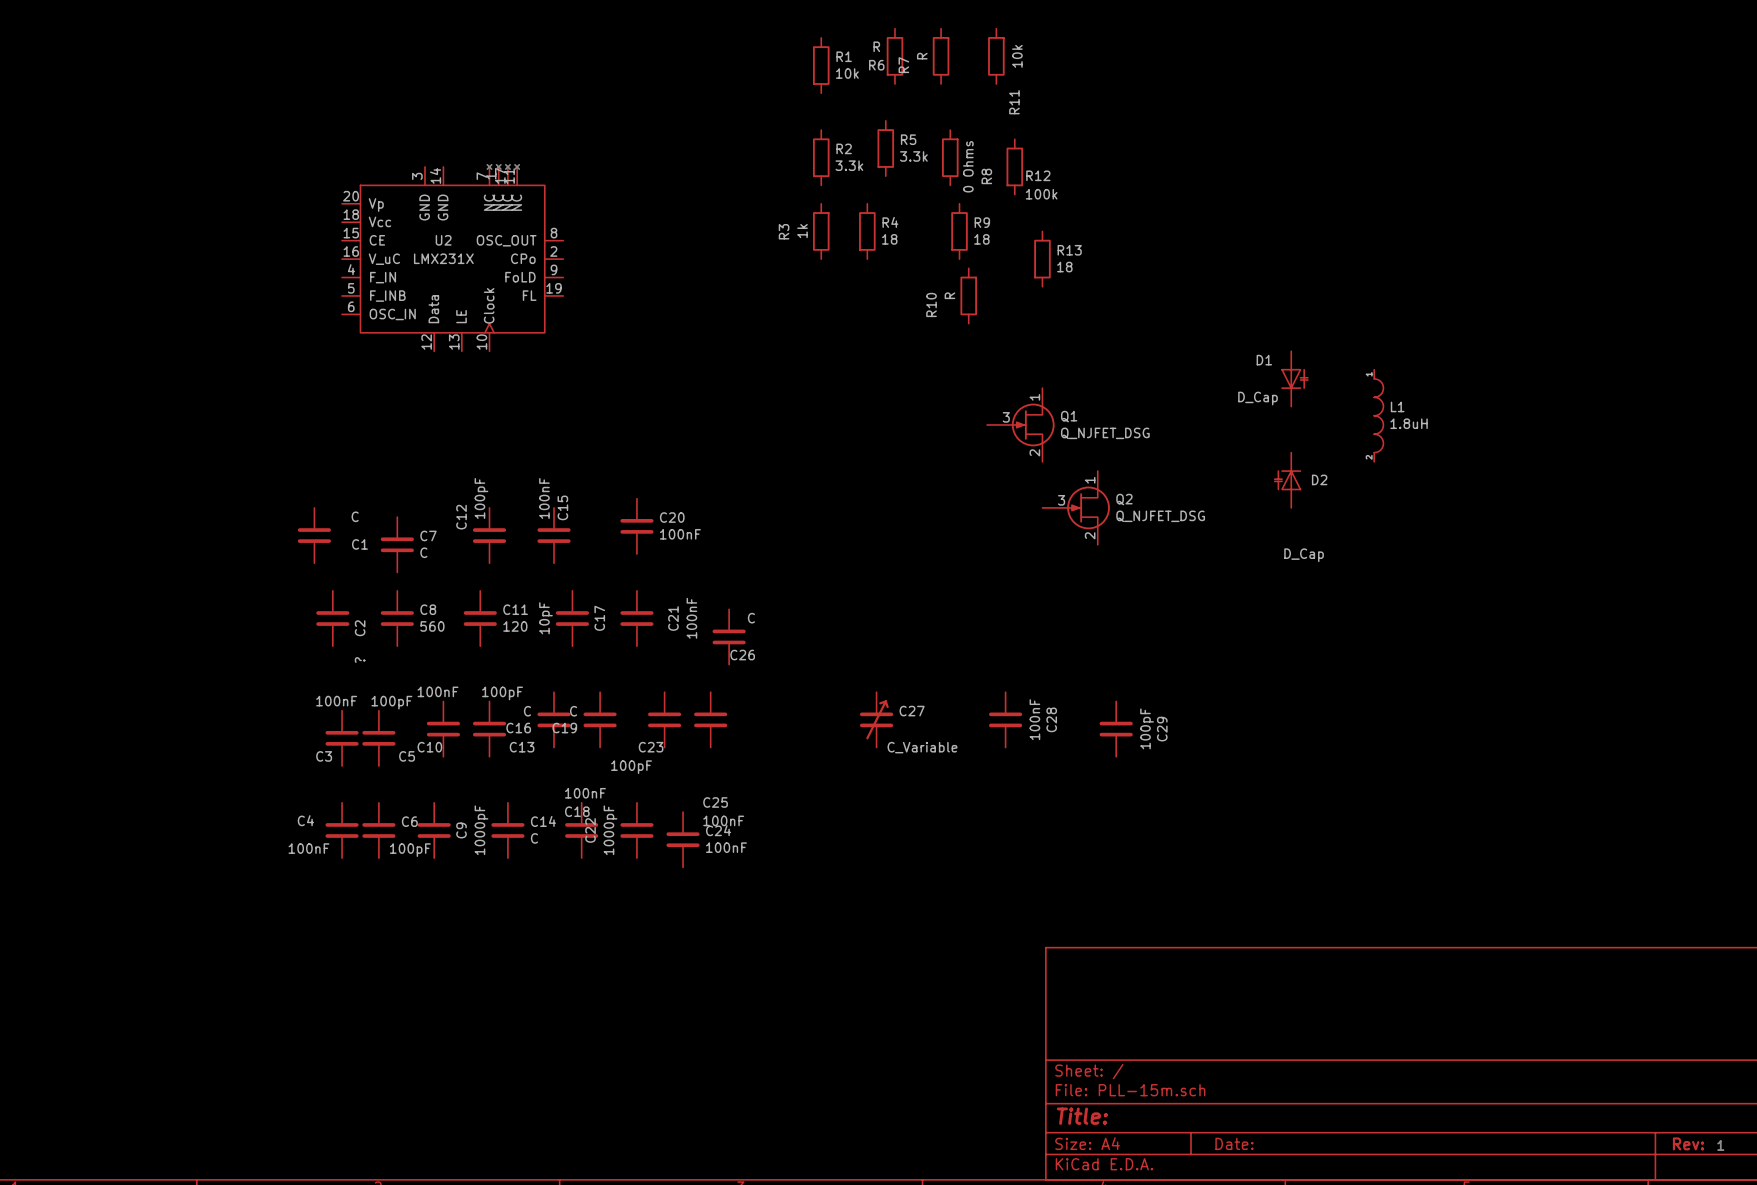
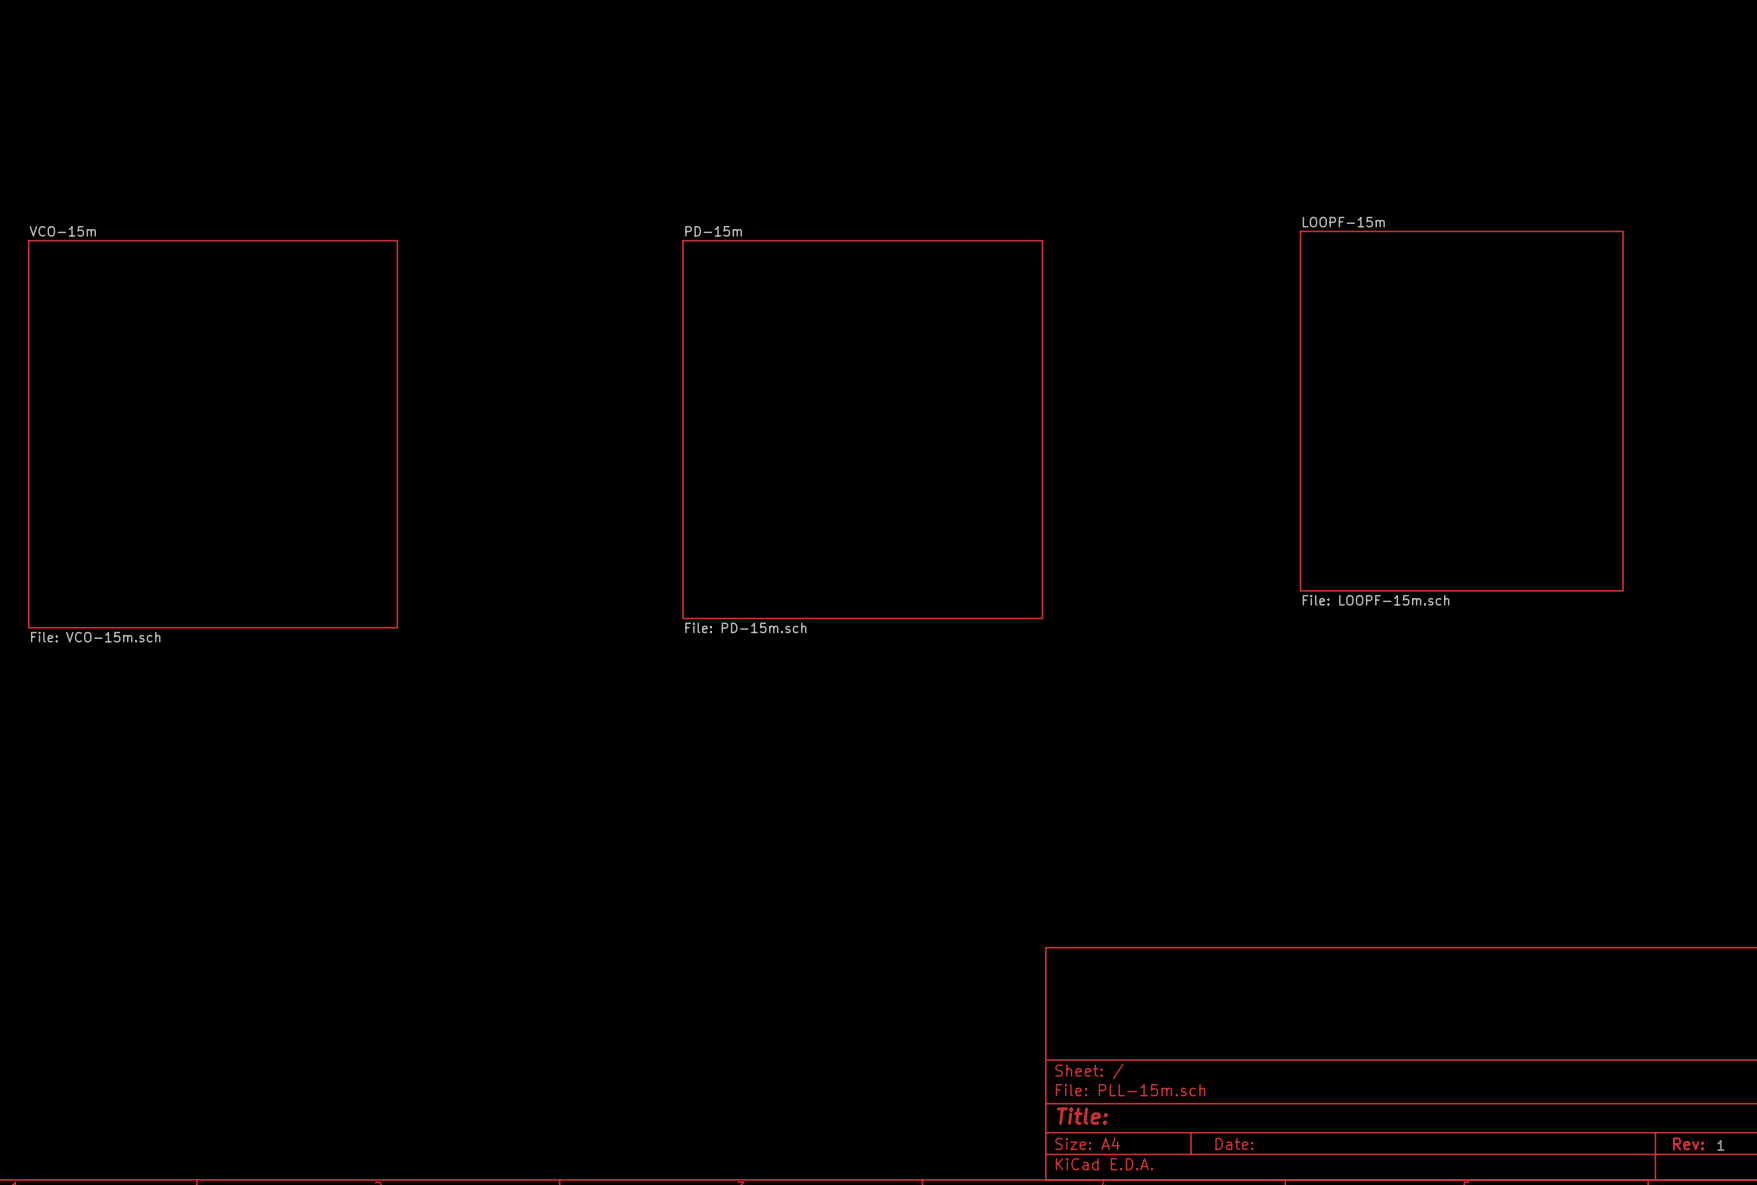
R6: R (894, 56) -> none
R7: R (941, 56) -> none
R11: 10k (996, 56) -> none
R1: 10k (821, 65) -> none
R5: 3.3k (885, 148) -> none
R2: 3.3k (821, 157) -> none
R8: 0 Ohms (950, 157) -> none
R12: 100k (1014, 166) -> none
R3: 1k (821, 231) -> none
R4: 18 (867, 231) -> none
R9: 18 (959, 231) -> none
U2: LMX231X (452, 258) -> none
R13: 18 (1042, 259) -> none
R10: R (968, 295) -> none
D1: D_Cap (1294, 378) -> none
sheet LOOPF-15m: none -> File: LOOPF-15m.sch (1461, 411)
L1: 1.8uH (1378, 415) -> none
Q1: Q_NJFET_DSG (1020, 424) -> none
sheet PD-15m: none -> File: PD-15m.sch (862, 429)
sheet VCO-15m: none -> File: VCO-15m.sch (213, 434)
D2: D_Cap (1287, 480) -> none
Q2: Q_NJFET_DSG (1076, 507) -> none
C20: 100nF (636, 526) -> none
C1: C (314, 535) -> none
C12: 100pF (489, 535) -> none
C15: 100nF (554, 535) -> none
C7: C (397, 544) -> none
C2: ? (332, 618) -> none
C8: 560 (397, 618) -> none
C11: 120 (480, 618) -> none
C17: 10pF (572, 618) -> none
C21: 100nF (636, 618) -> none
C26: C (729, 636) -> none
C16: C (554, 719) -> none
C19: C (600, 719) -> none
C23: 100pF (664, 719) -> none
C25: 100nF (710, 719) -> none
C27: C_Variable (876, 719) -> none
C28: 100nF (1005, 719) -> none
C10: 100nF (443, 729) -> none
C13: 100pF (489, 729) -> none
C29: 100pF (1116, 729) -> none
C3: 100nF (342, 738) -> none
C5: 100pF (378, 738) -> none
C4: 100nF (342, 830) -> none
C6: 100pF (378, 830) -> none
C9: 1000pF (434, 830) -> none
C14: C (507, 830) -> none
C18: 100nF (581, 830) -> none
C22: 1000pF (636, 830) -> none
C24: 100nF (683, 839) -> none

